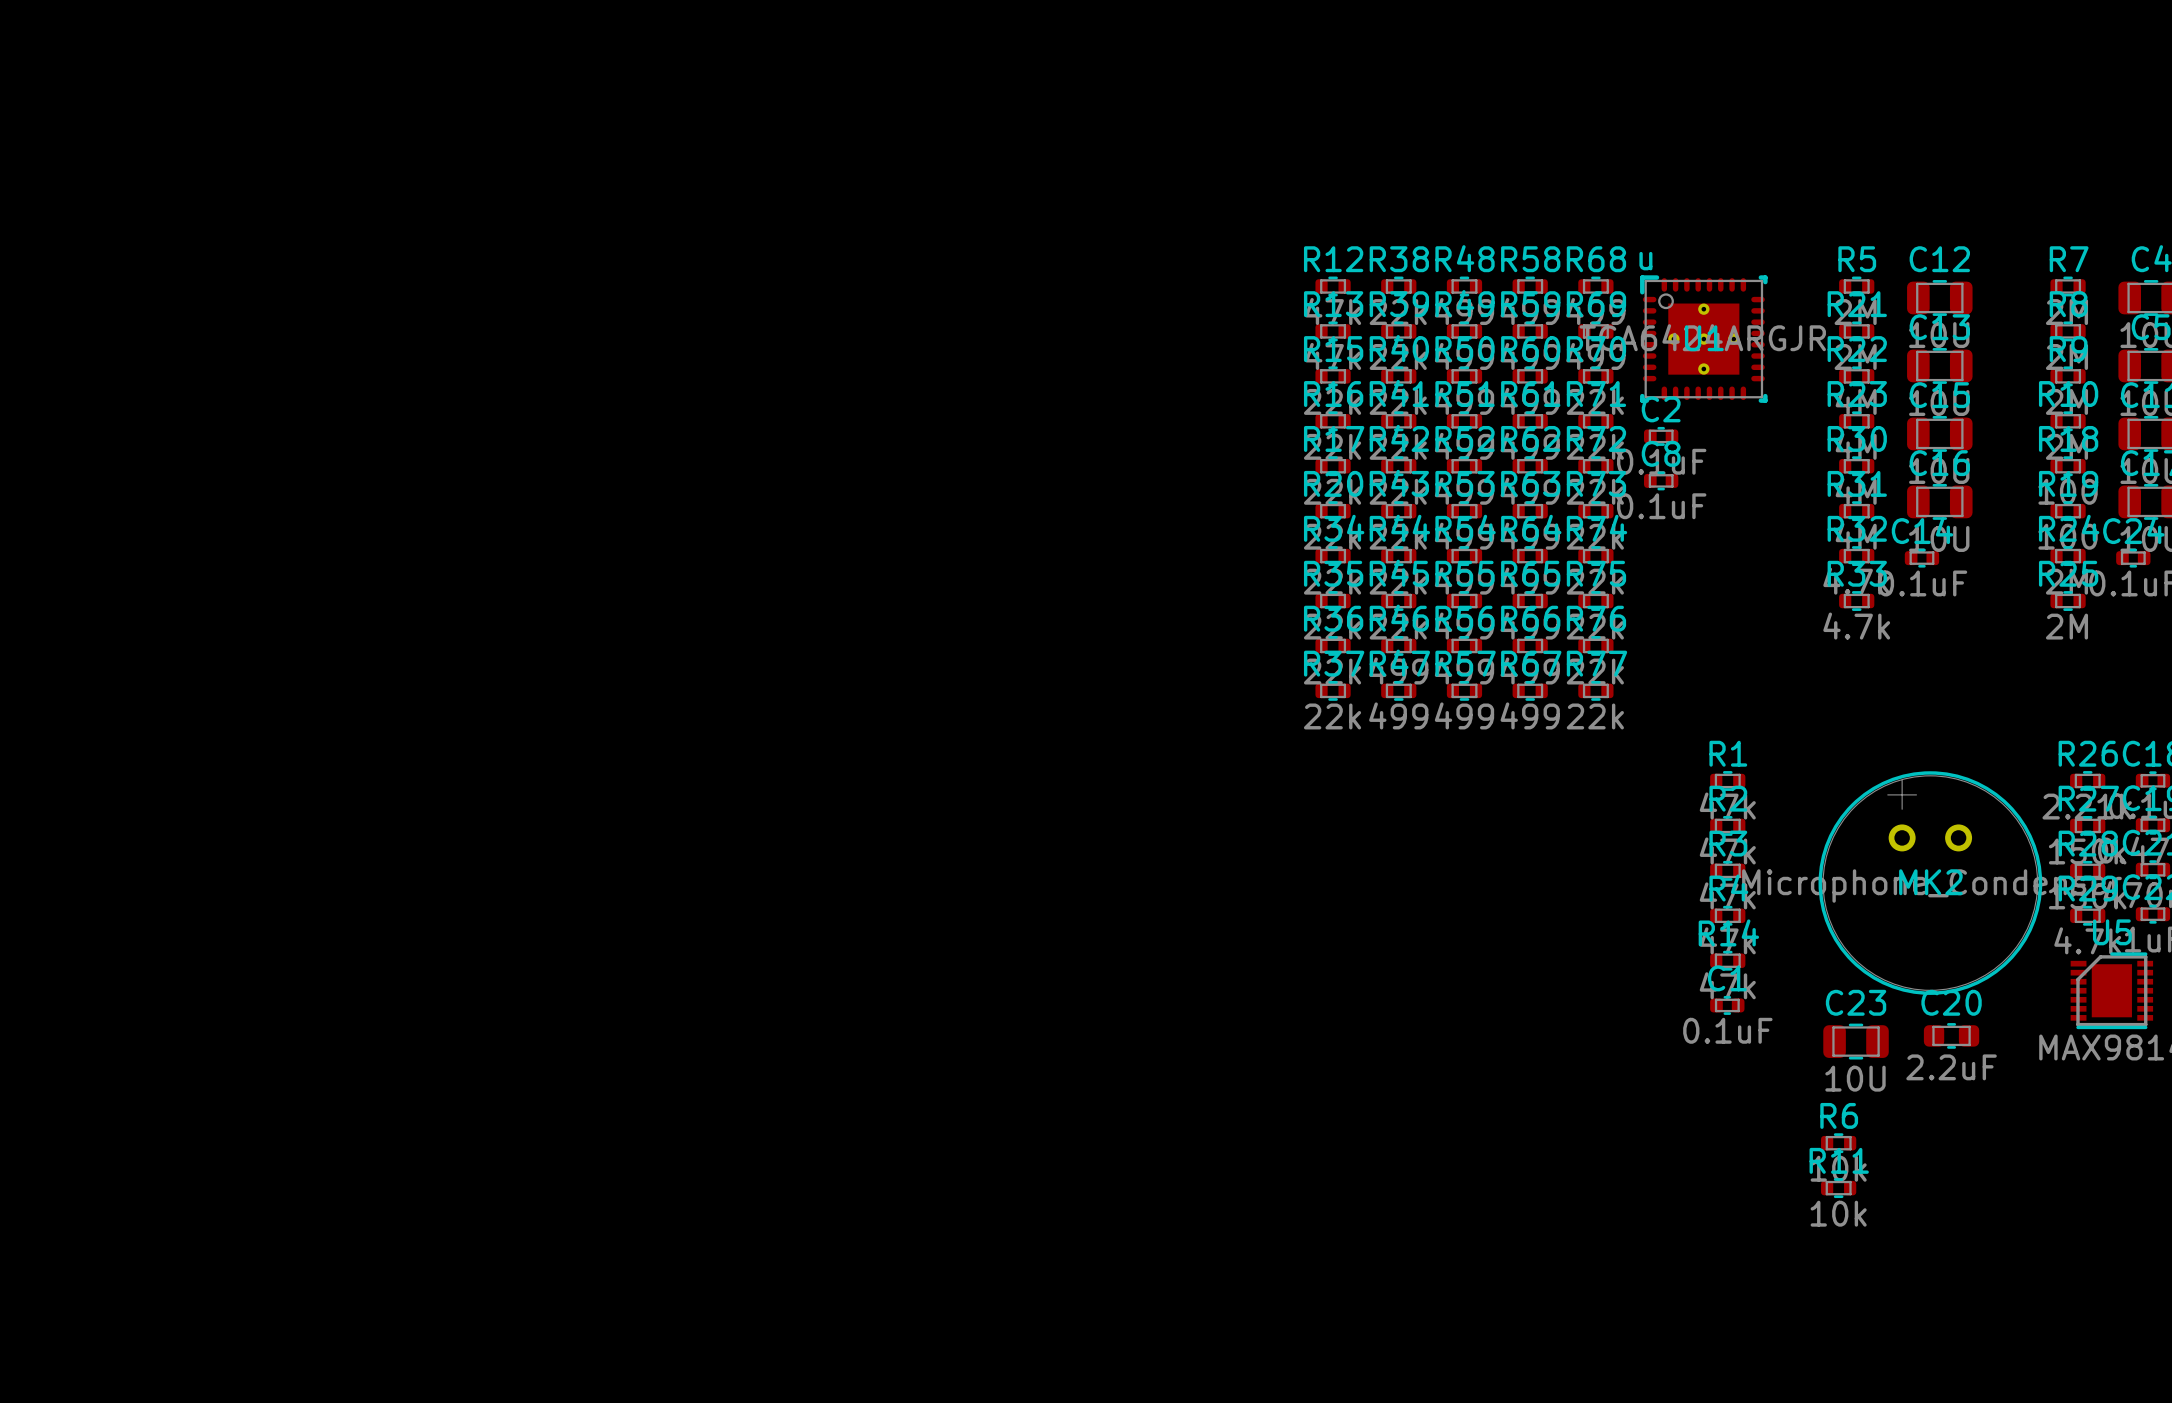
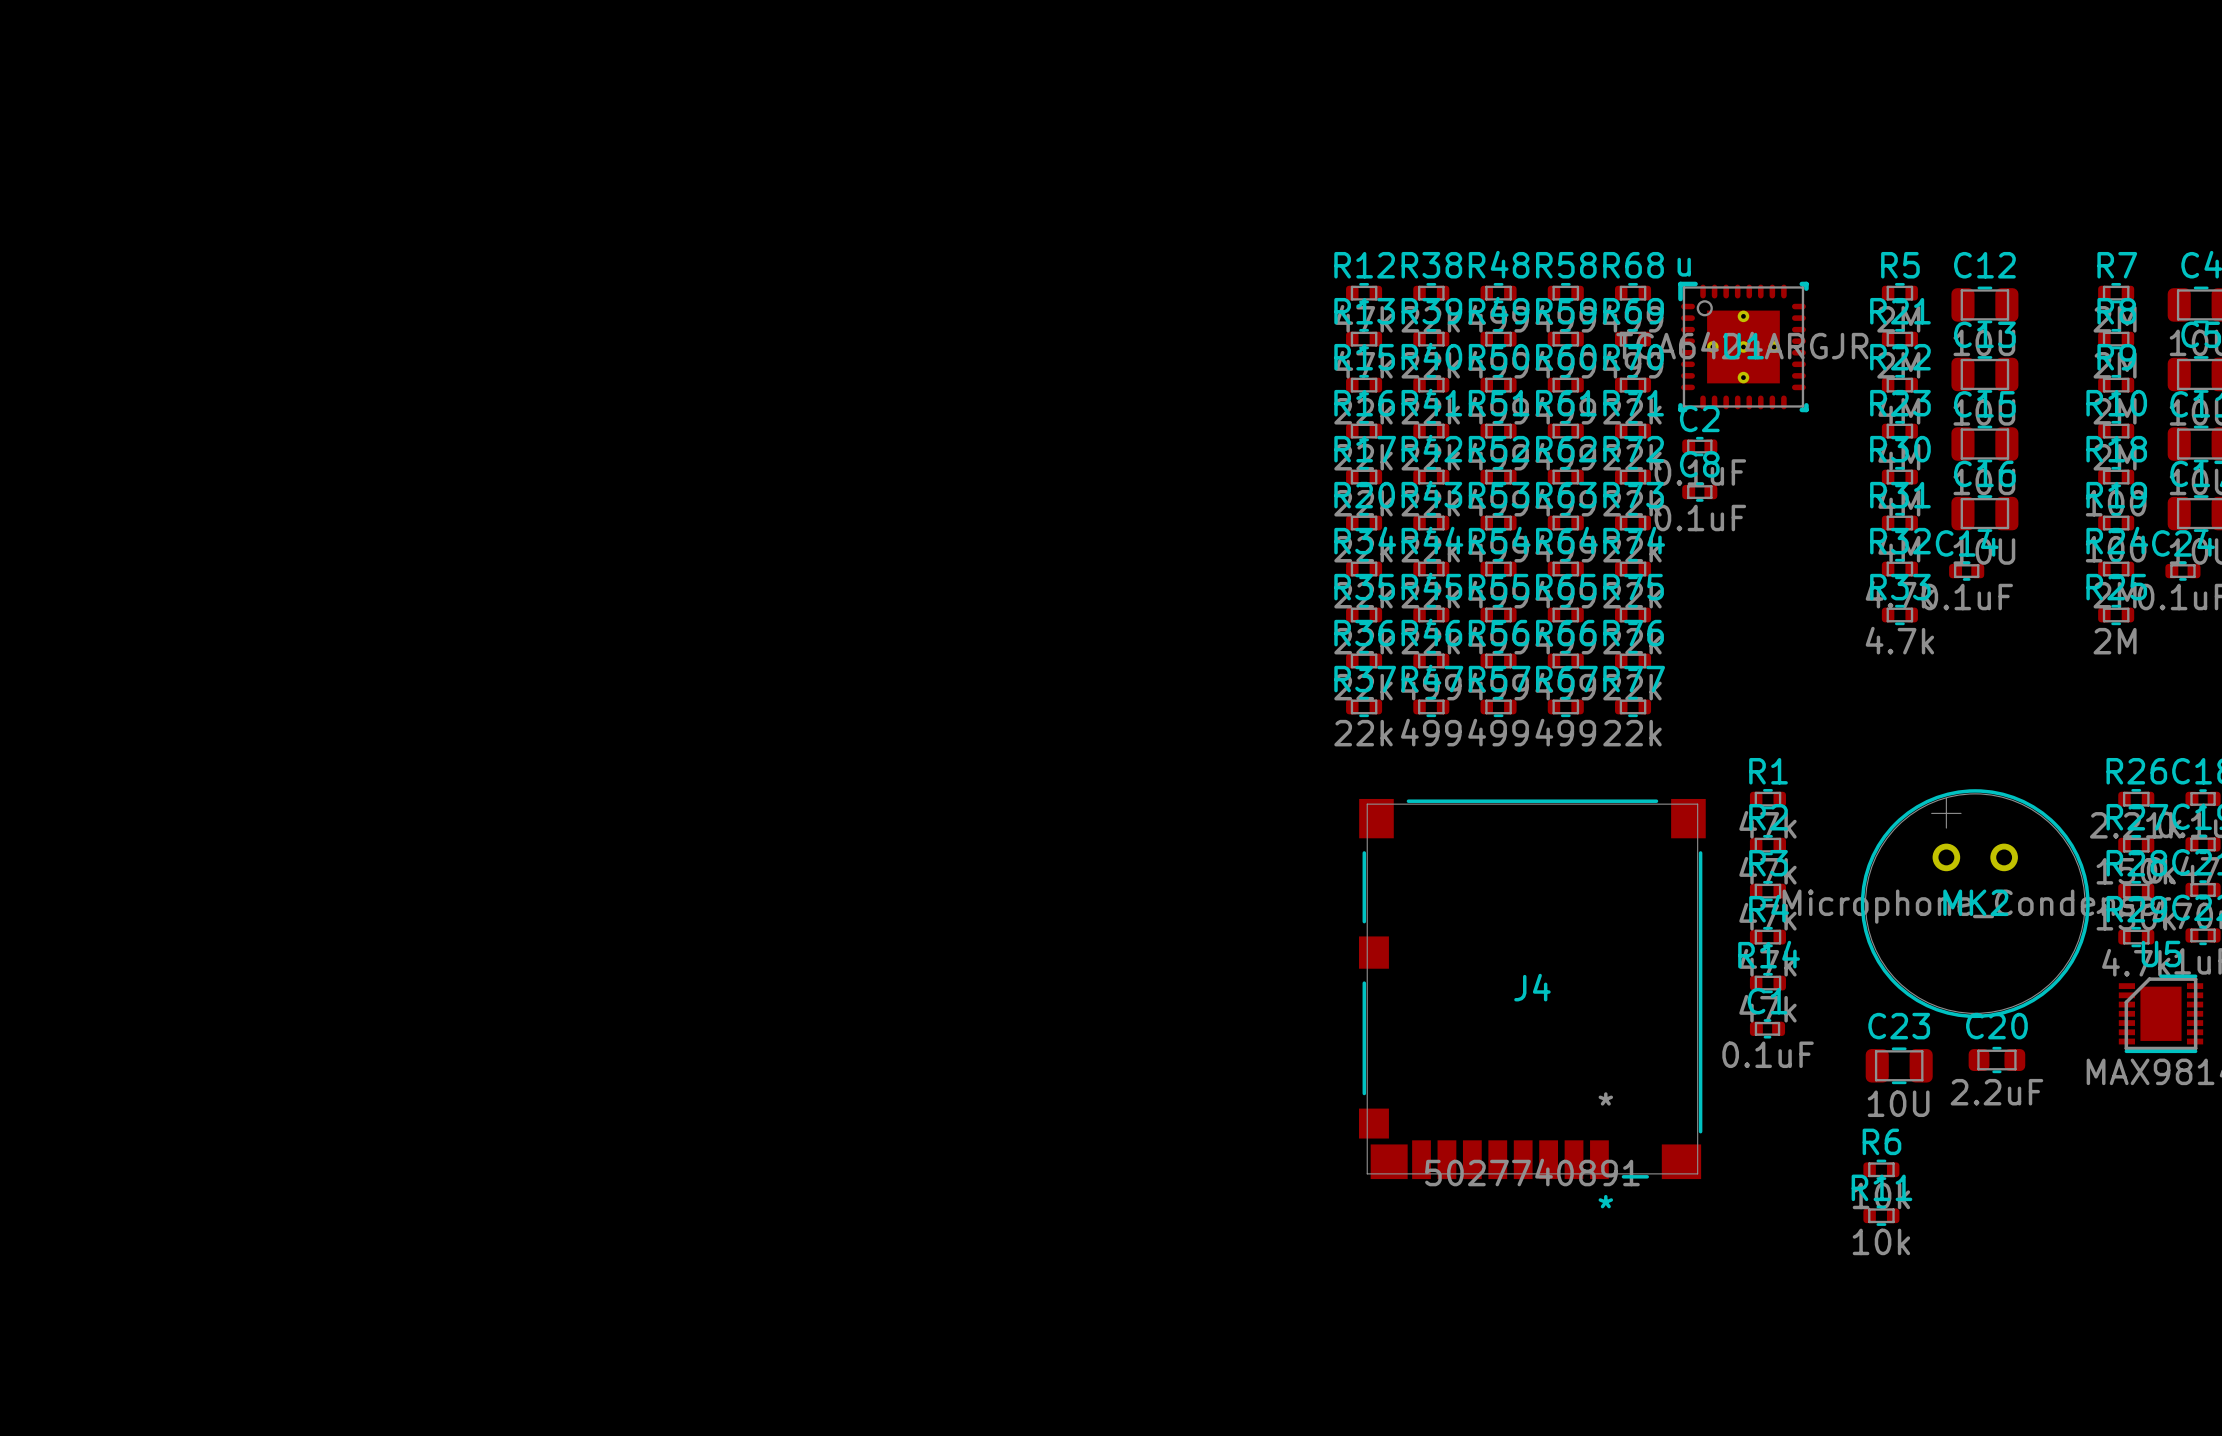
J4: none -> 5027740891 (1532, 989)

